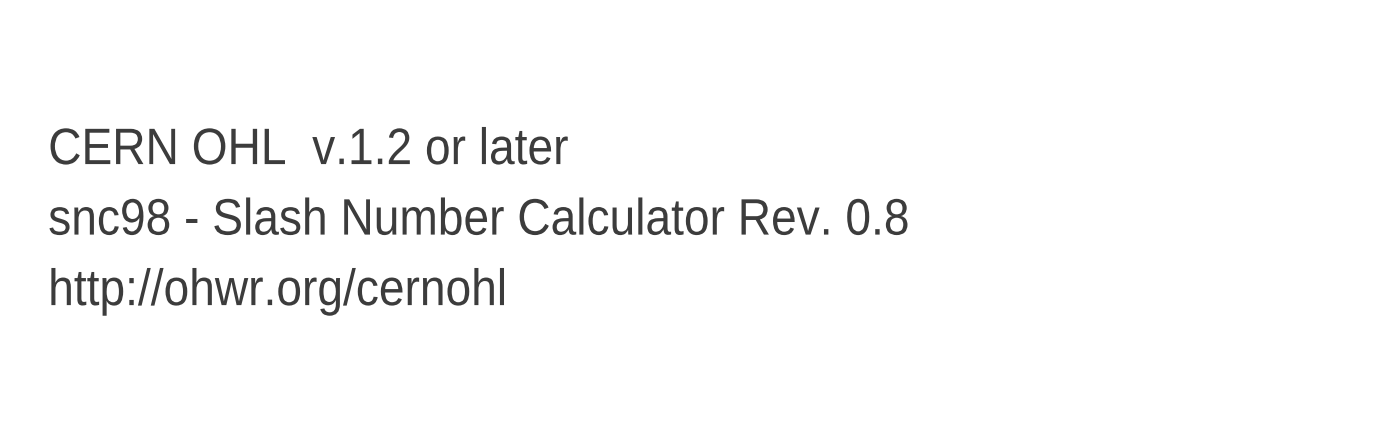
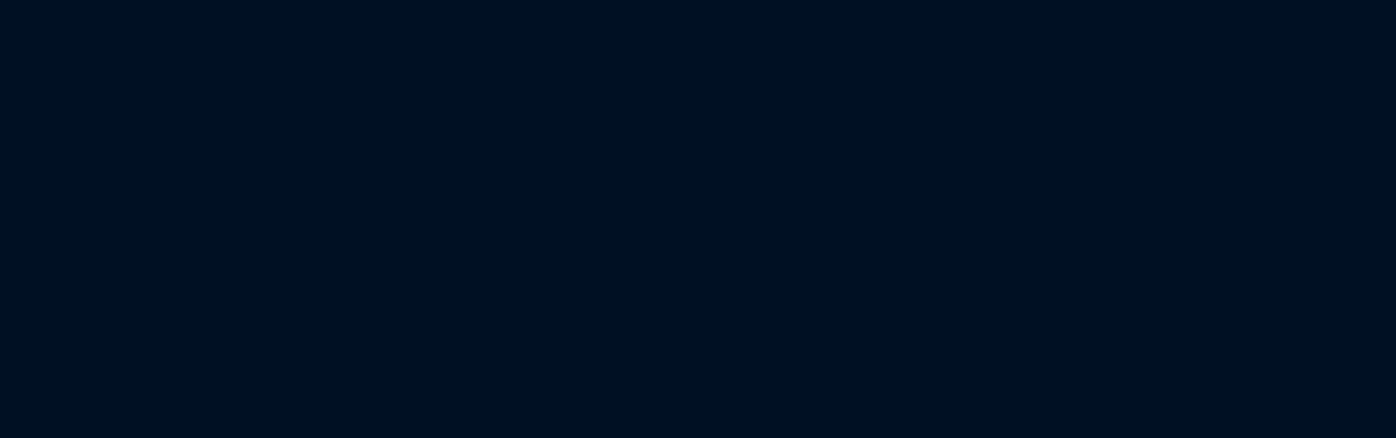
text: CERN OHL v.1.2 or later (309, 145) -> none
text: snc98 - Slash Number Calculator Rev. 0.8 (478, 216) -> none
text: http://ohwr.org/cernohl (277, 291) -> none

